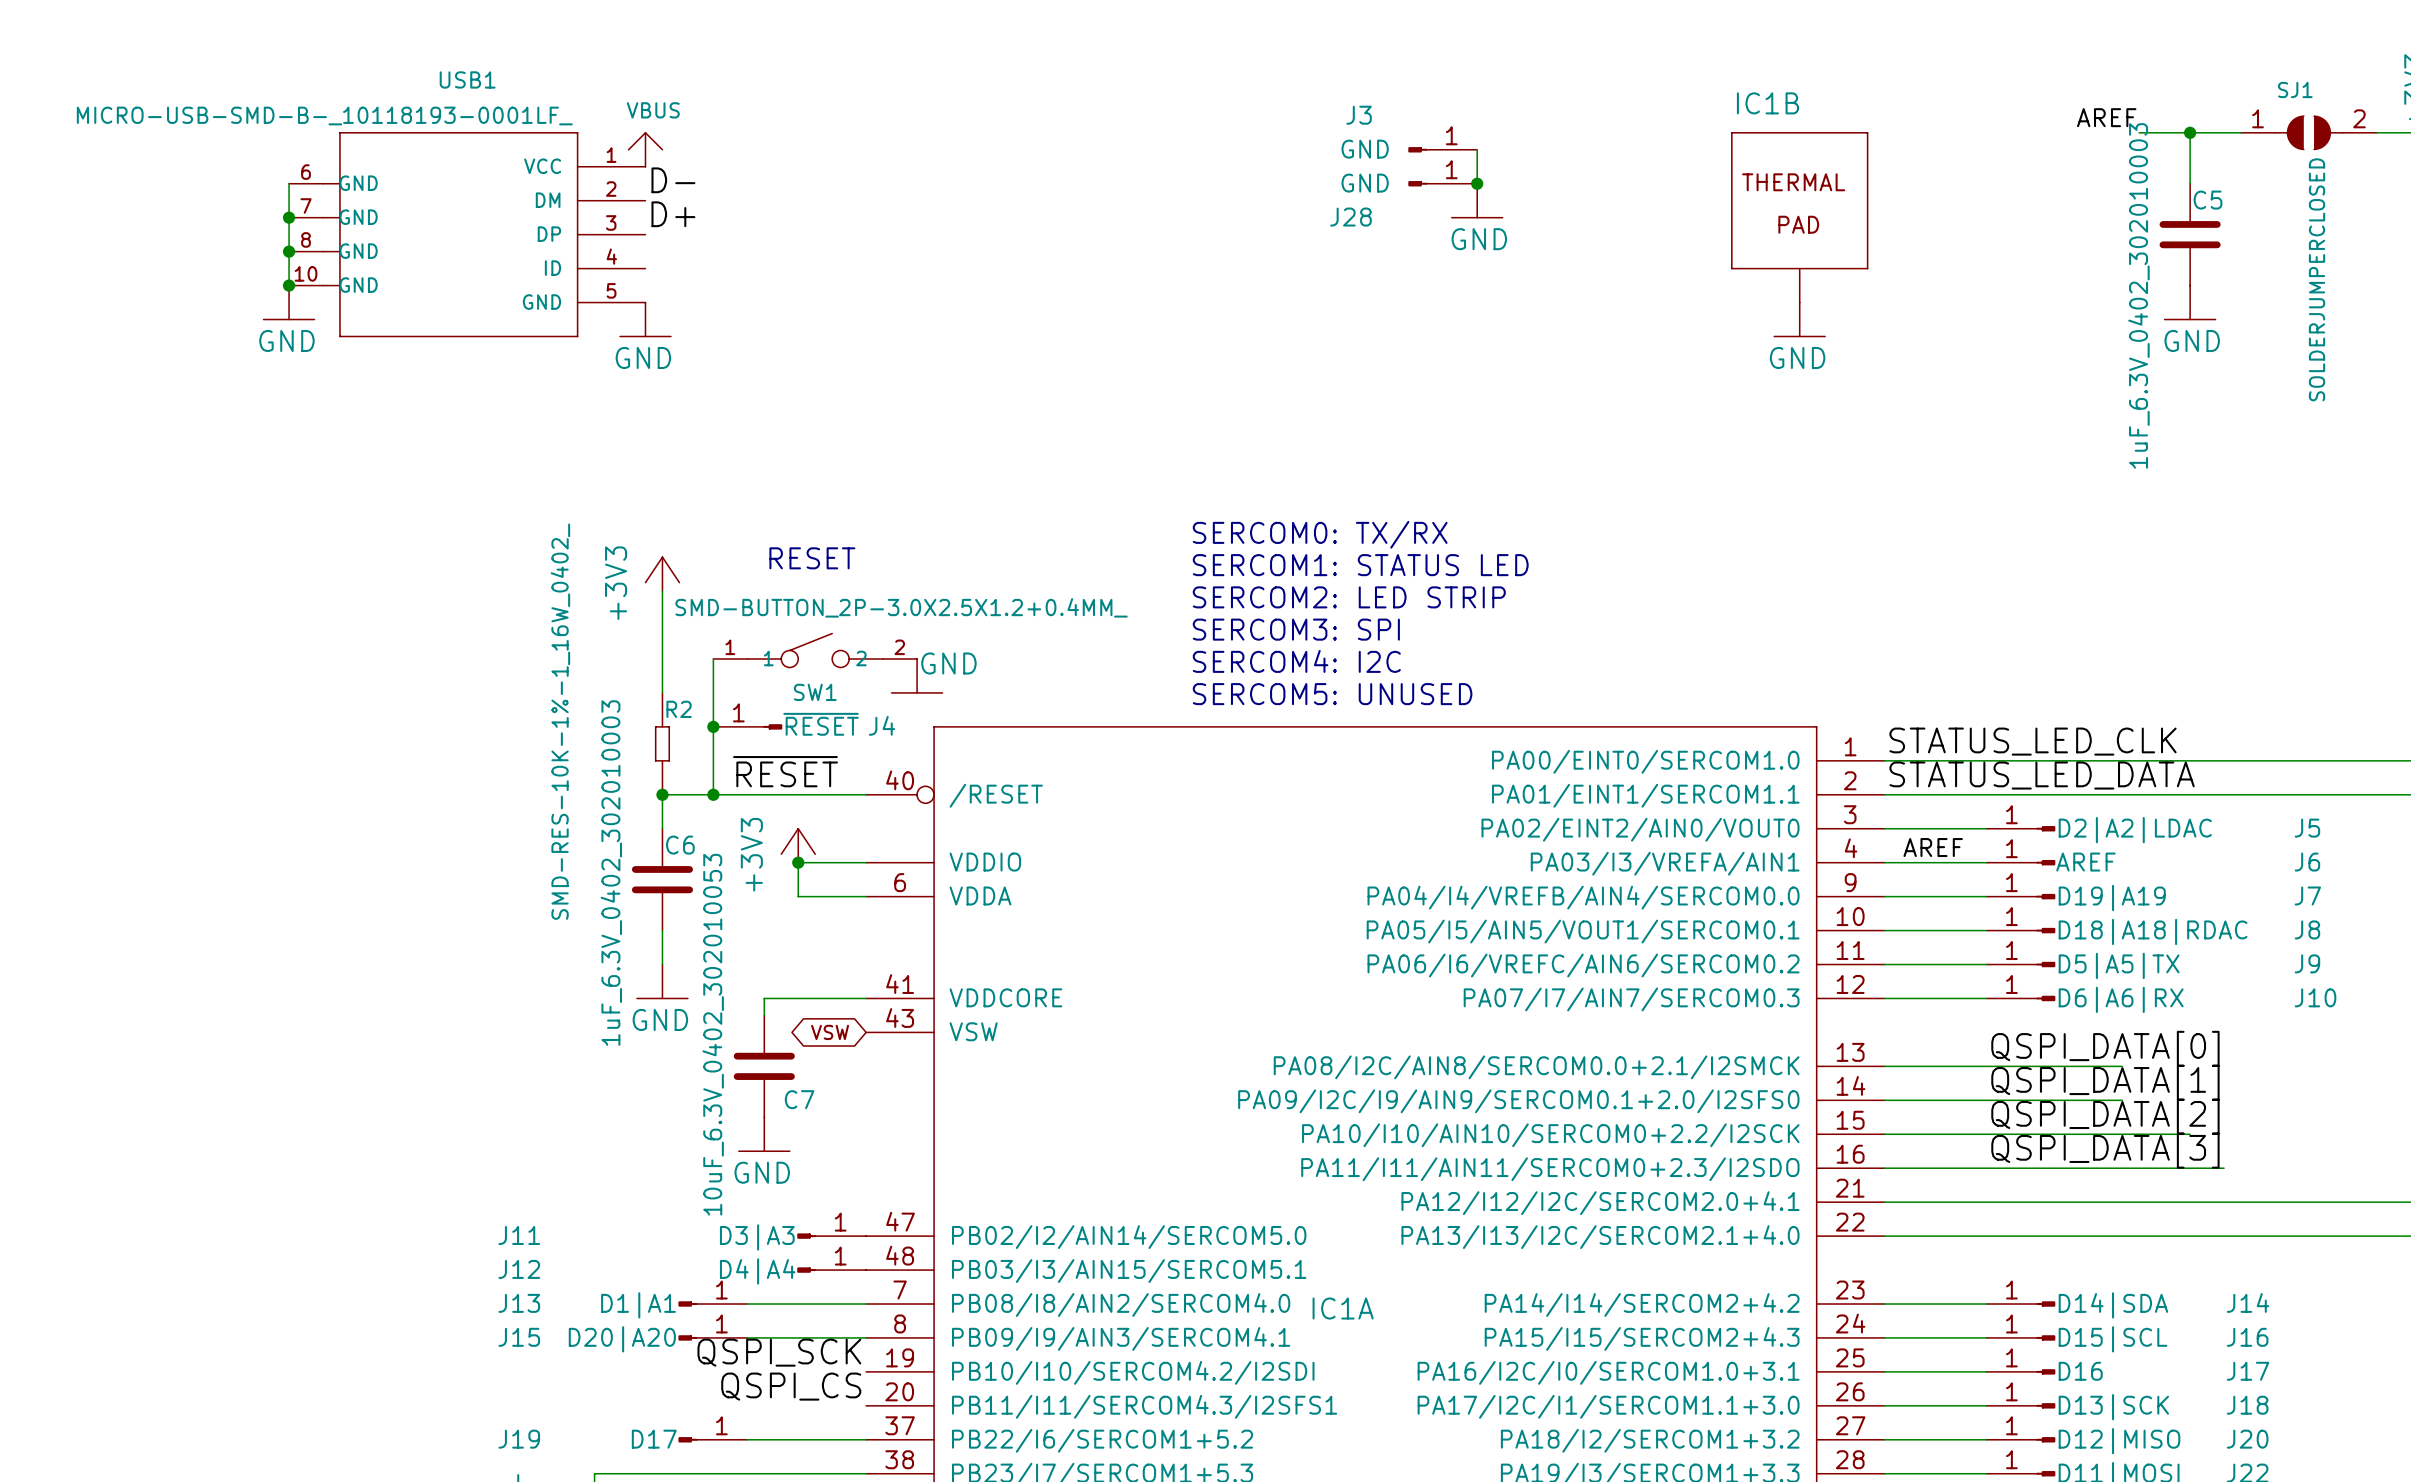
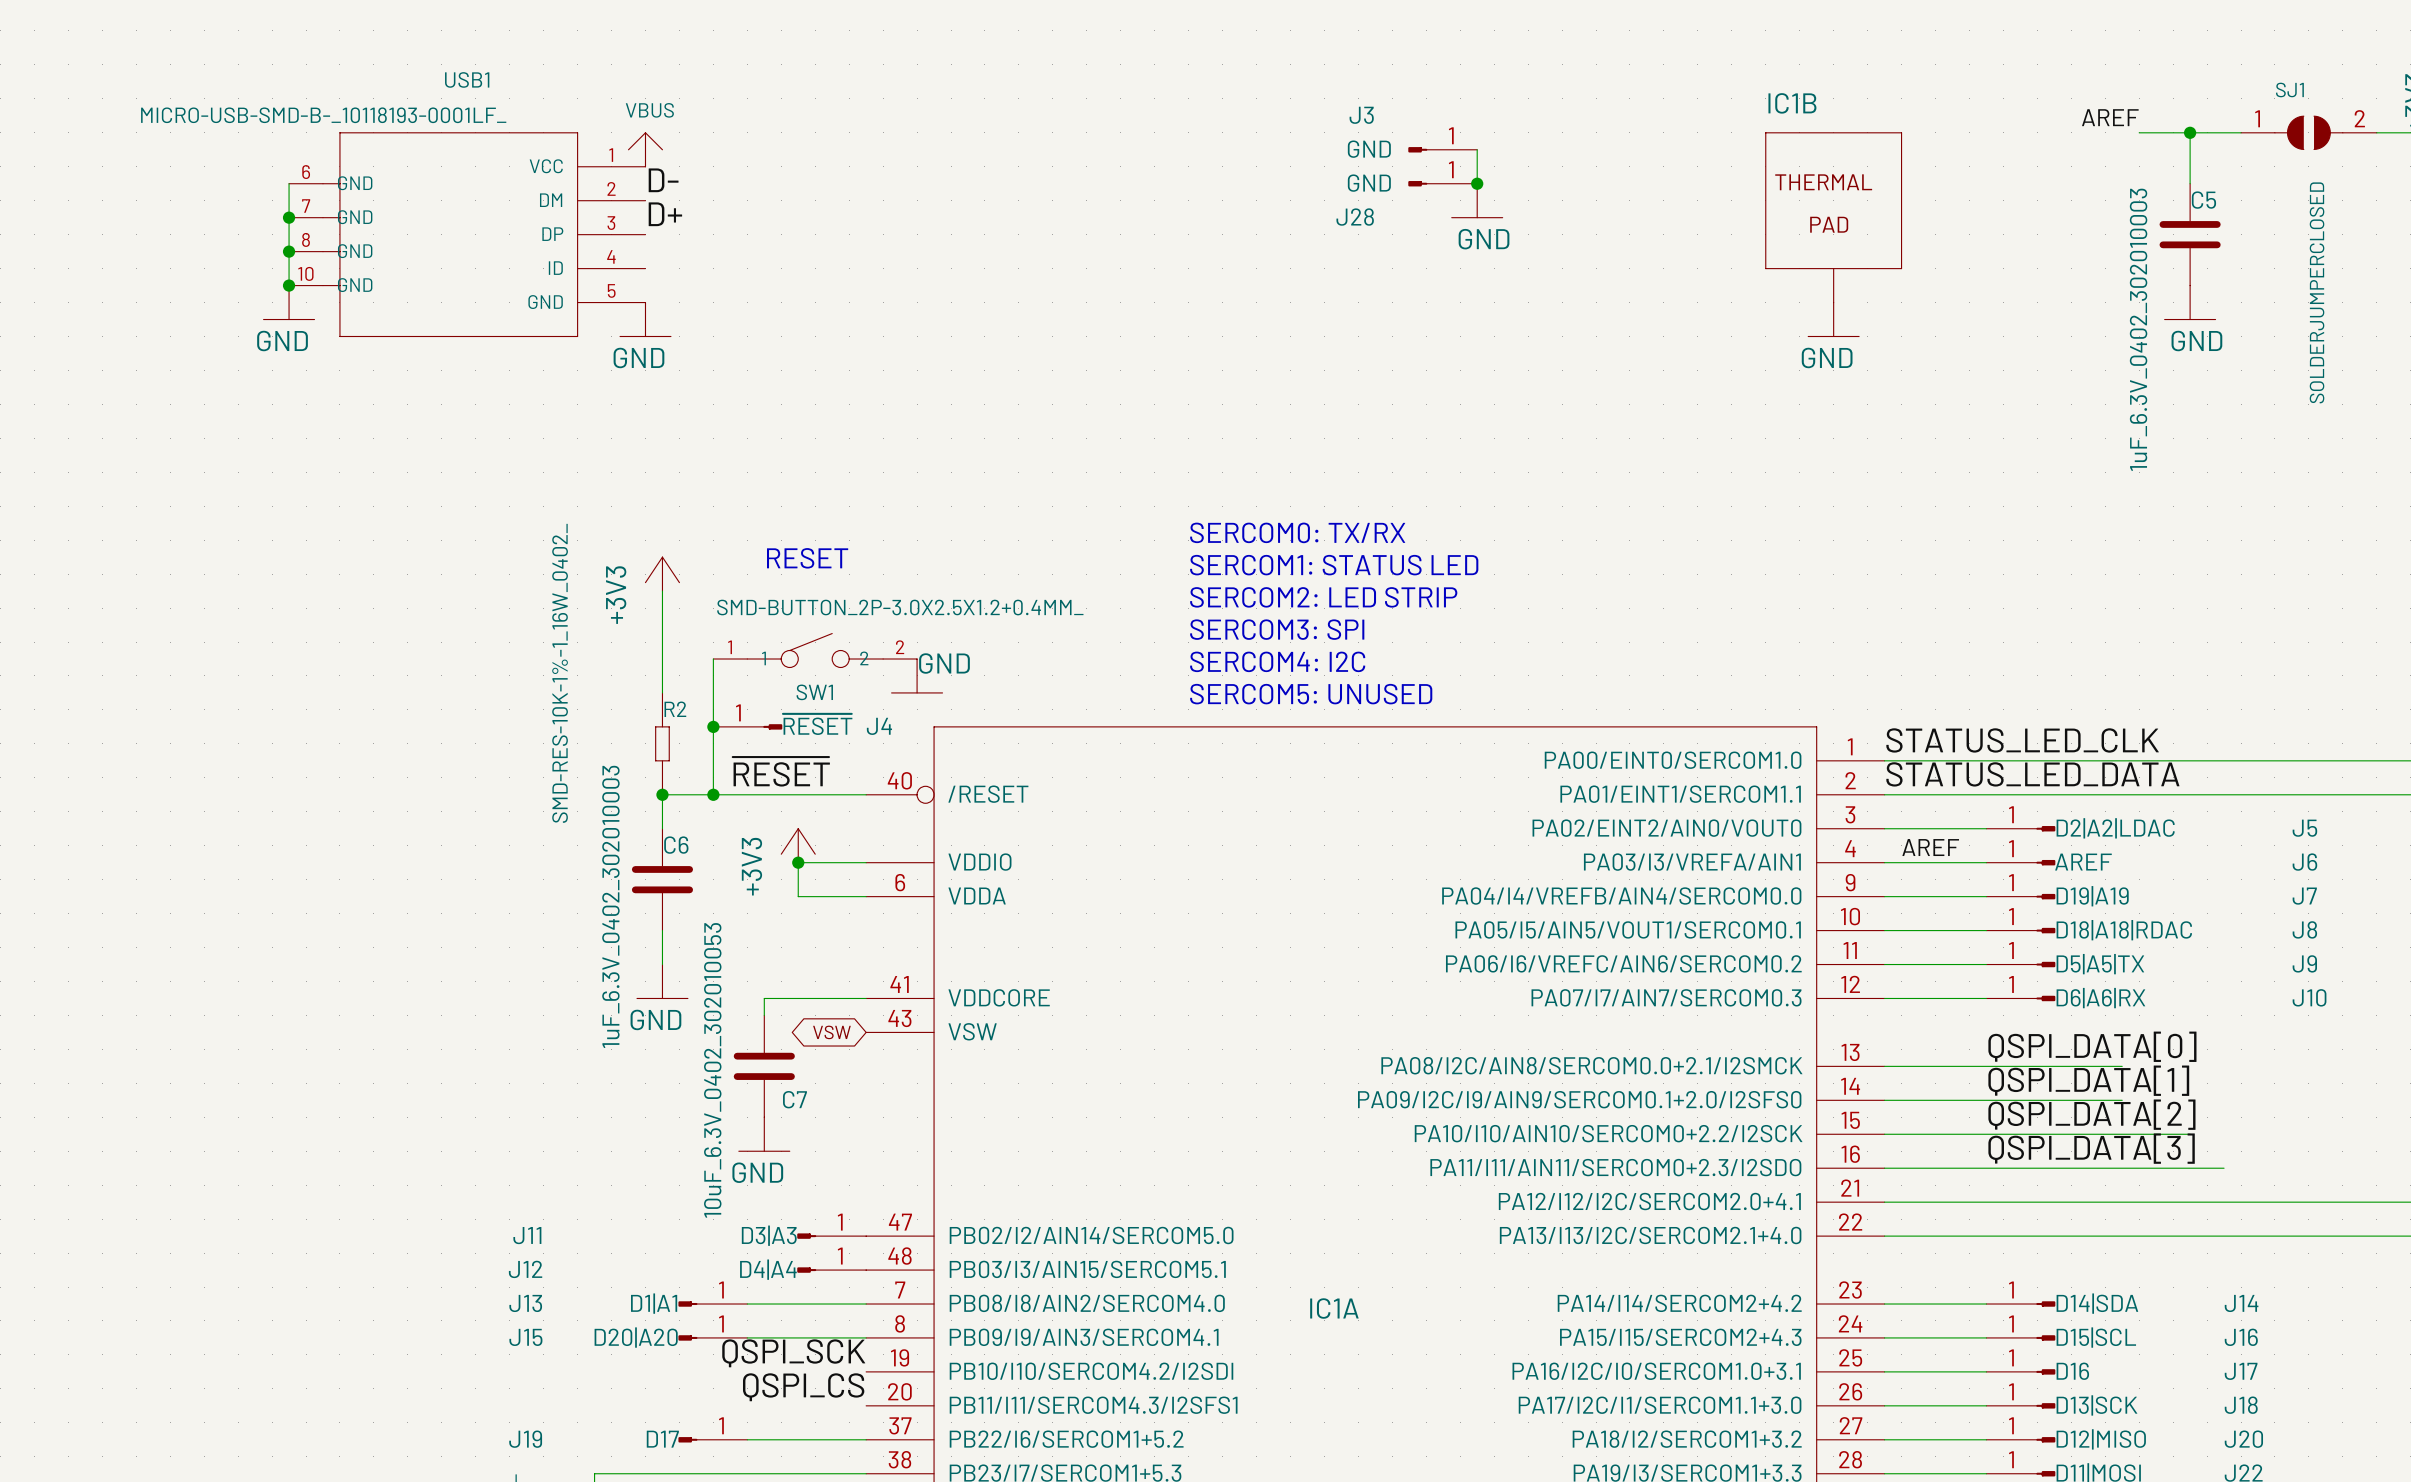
IC1B position: (1799, 217) -> (1833, 217)
power symbol position: GND (1799, 319) -> GND (1833, 319)

